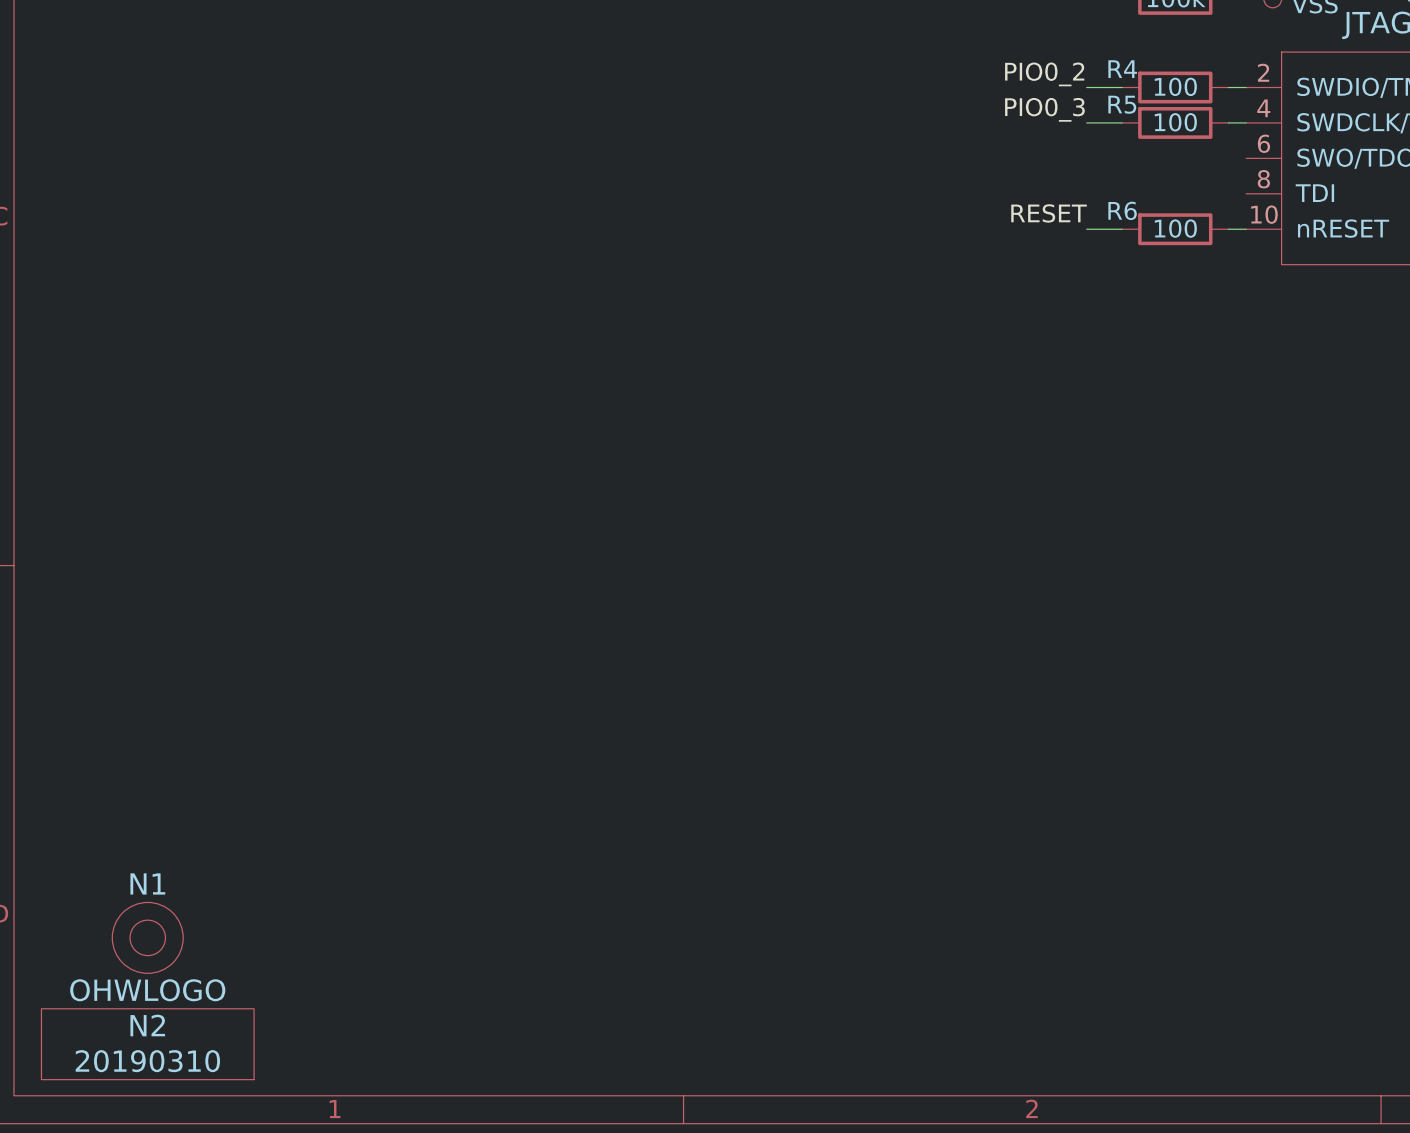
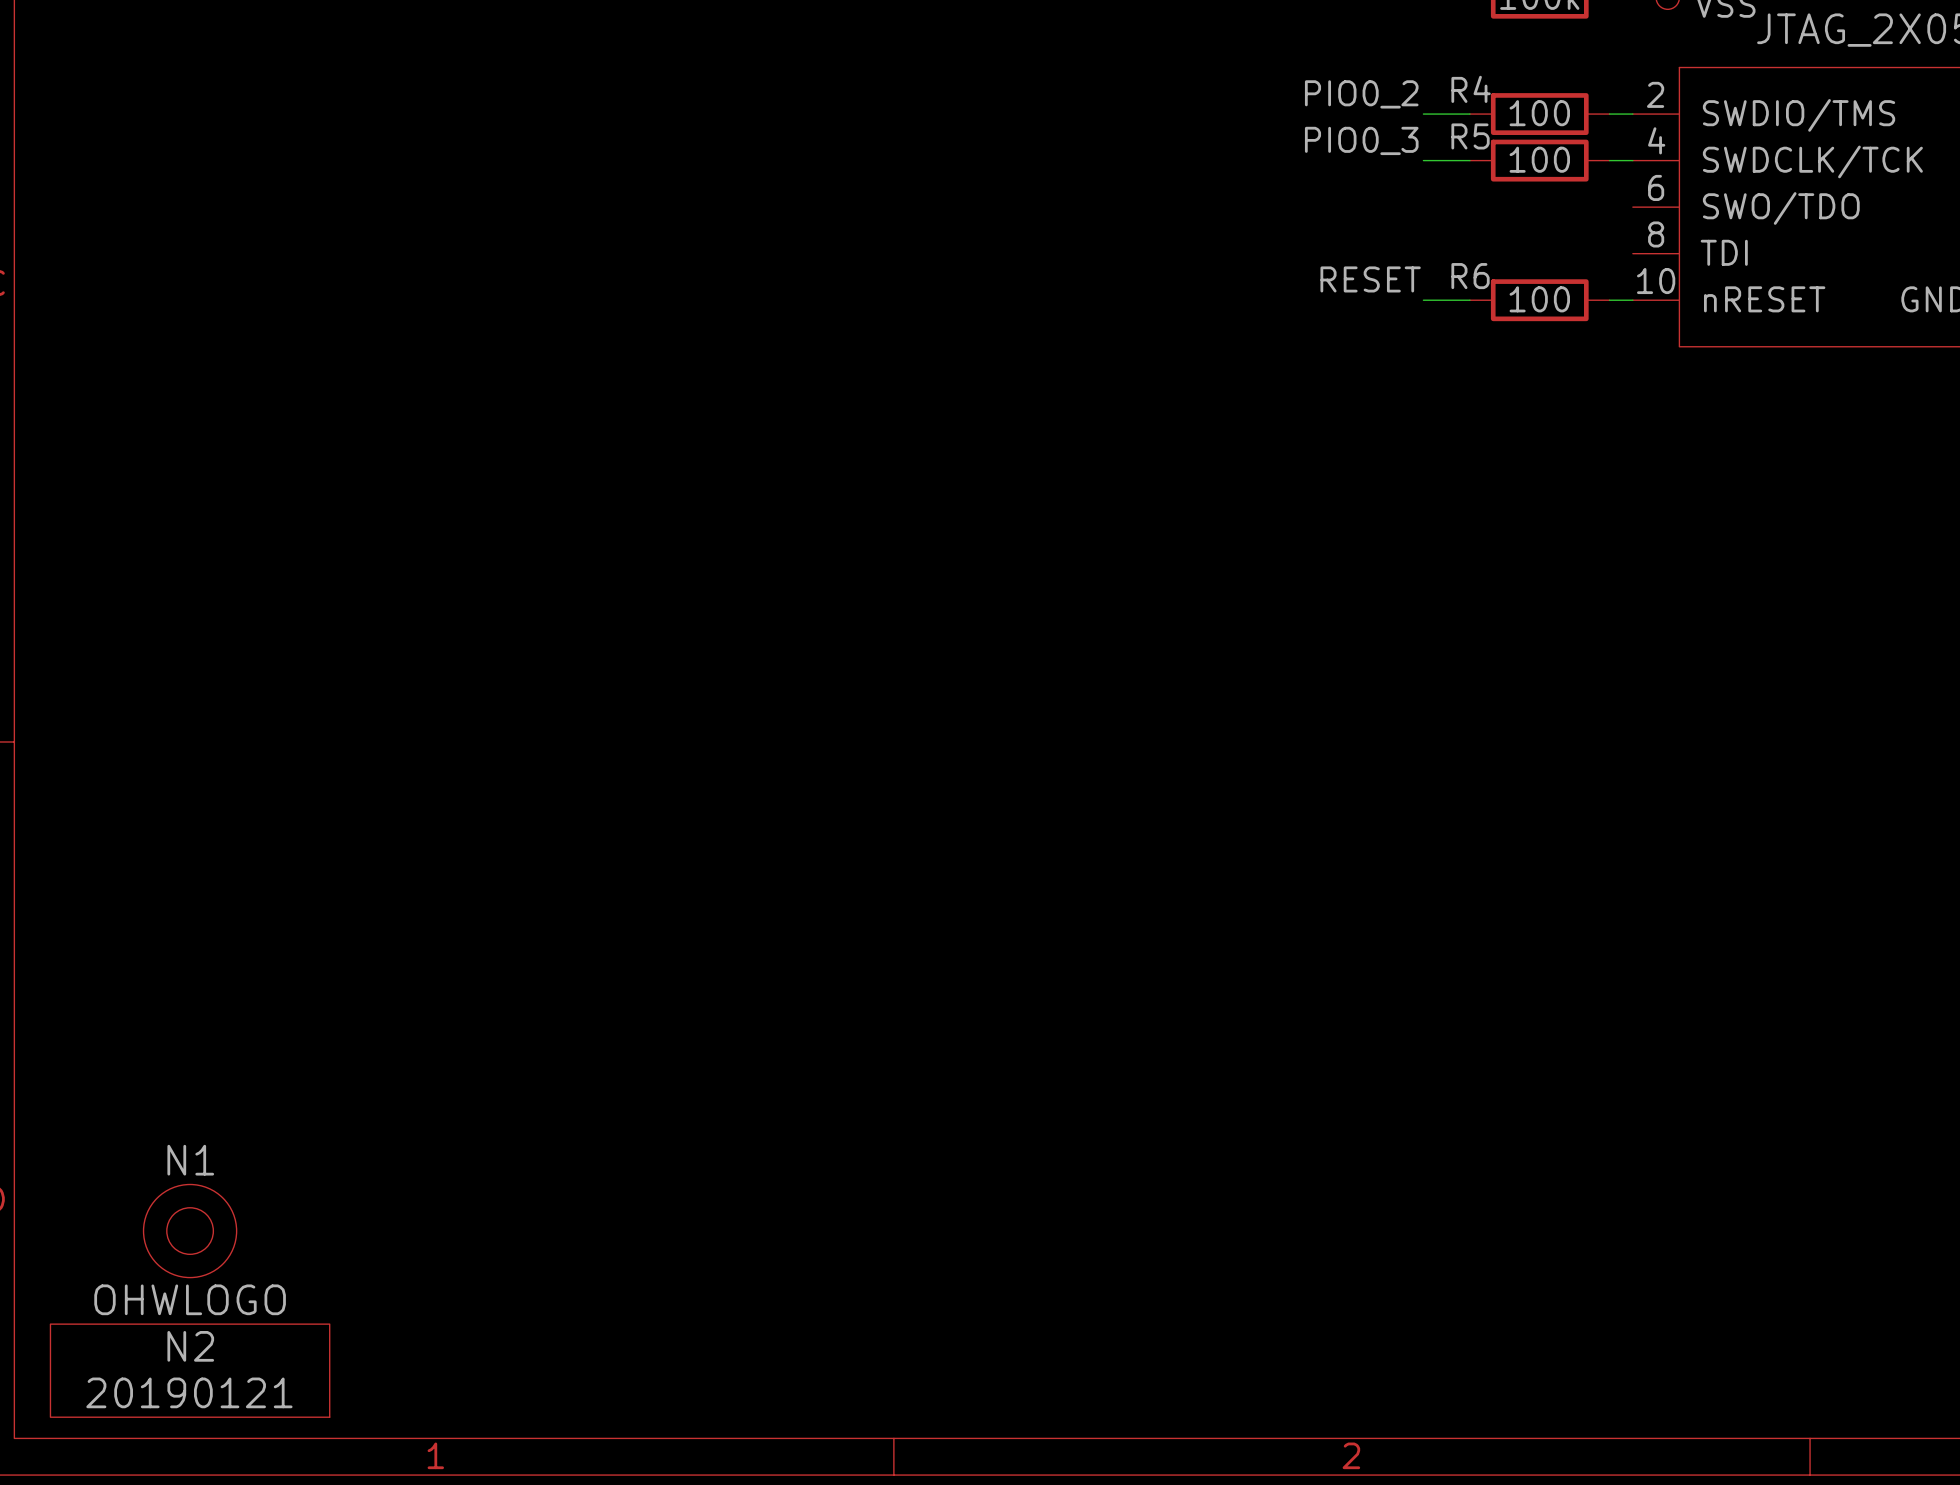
N2 value: 20190310 (147, 1061) -> 20190121 (189, 1392)

